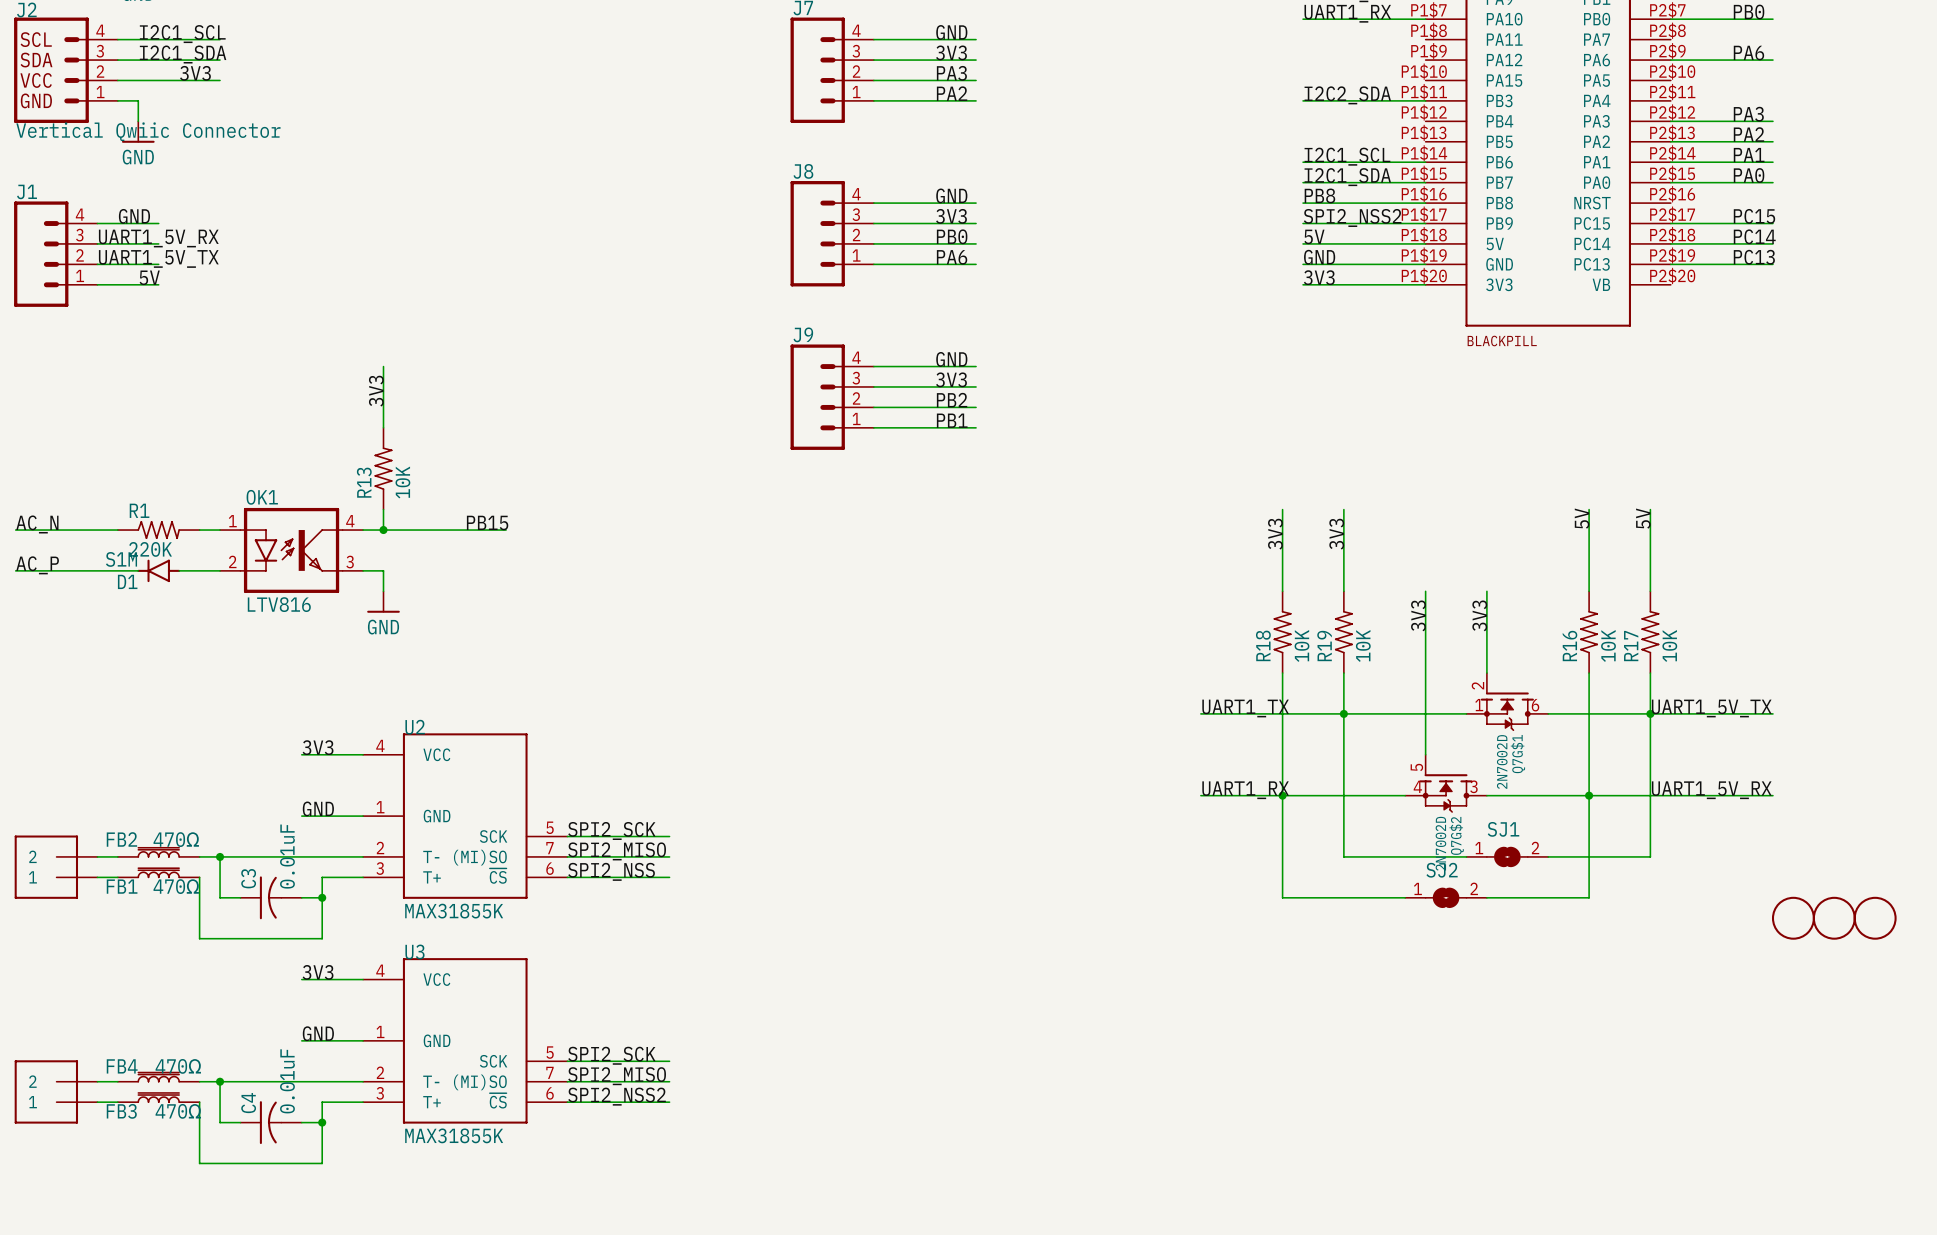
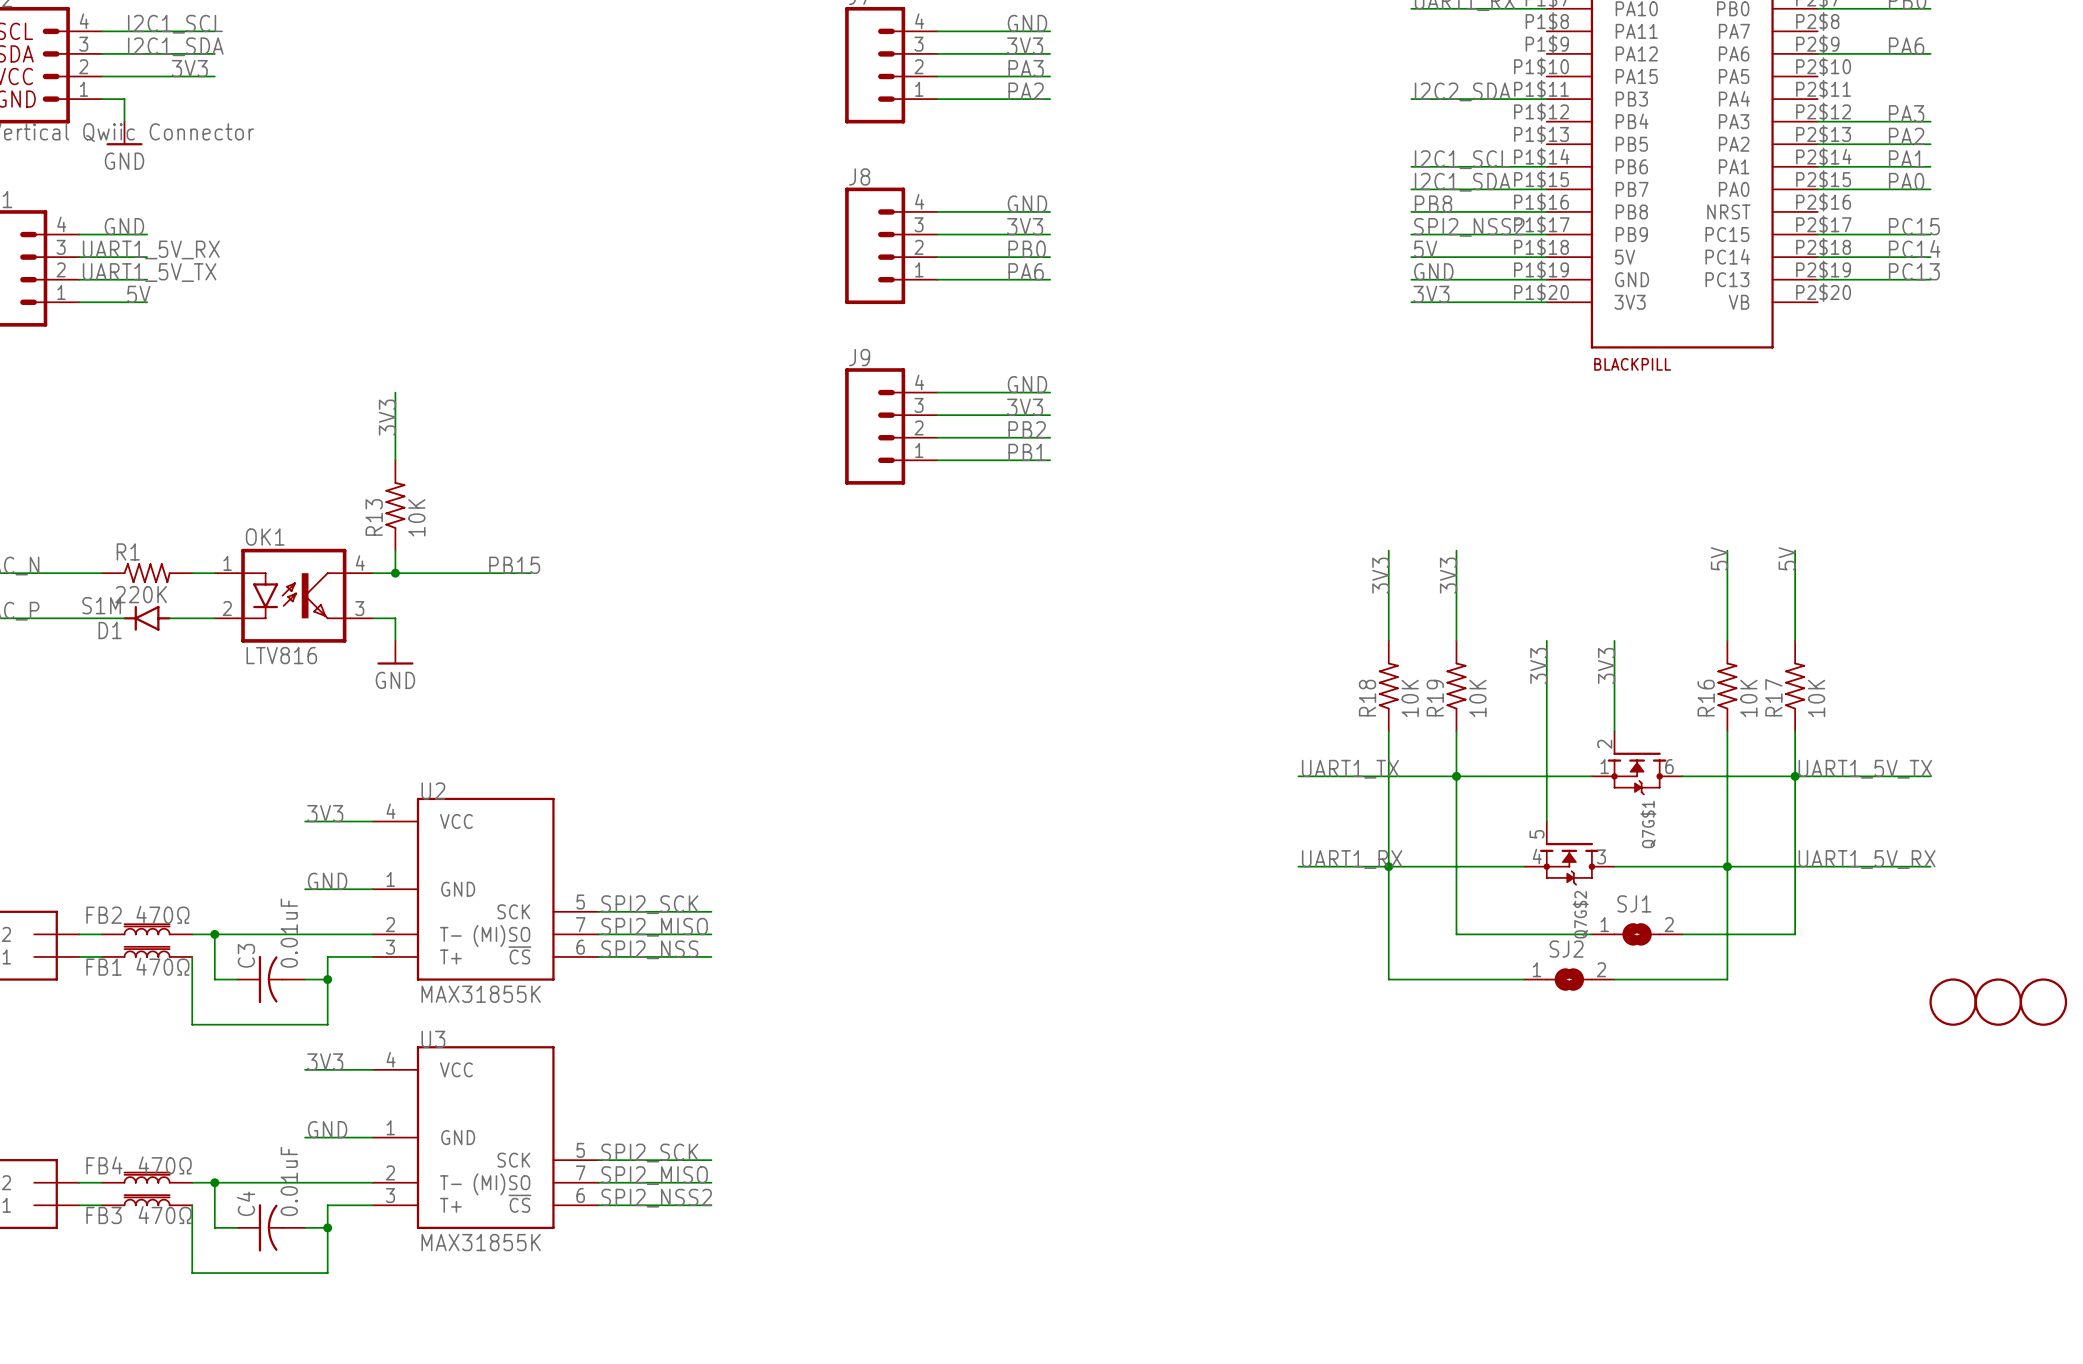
Q7G$1 value: 2N7002D (1502, 761) -> none
Q7G$2 value: 2N7002D (1440, 843) -> none

